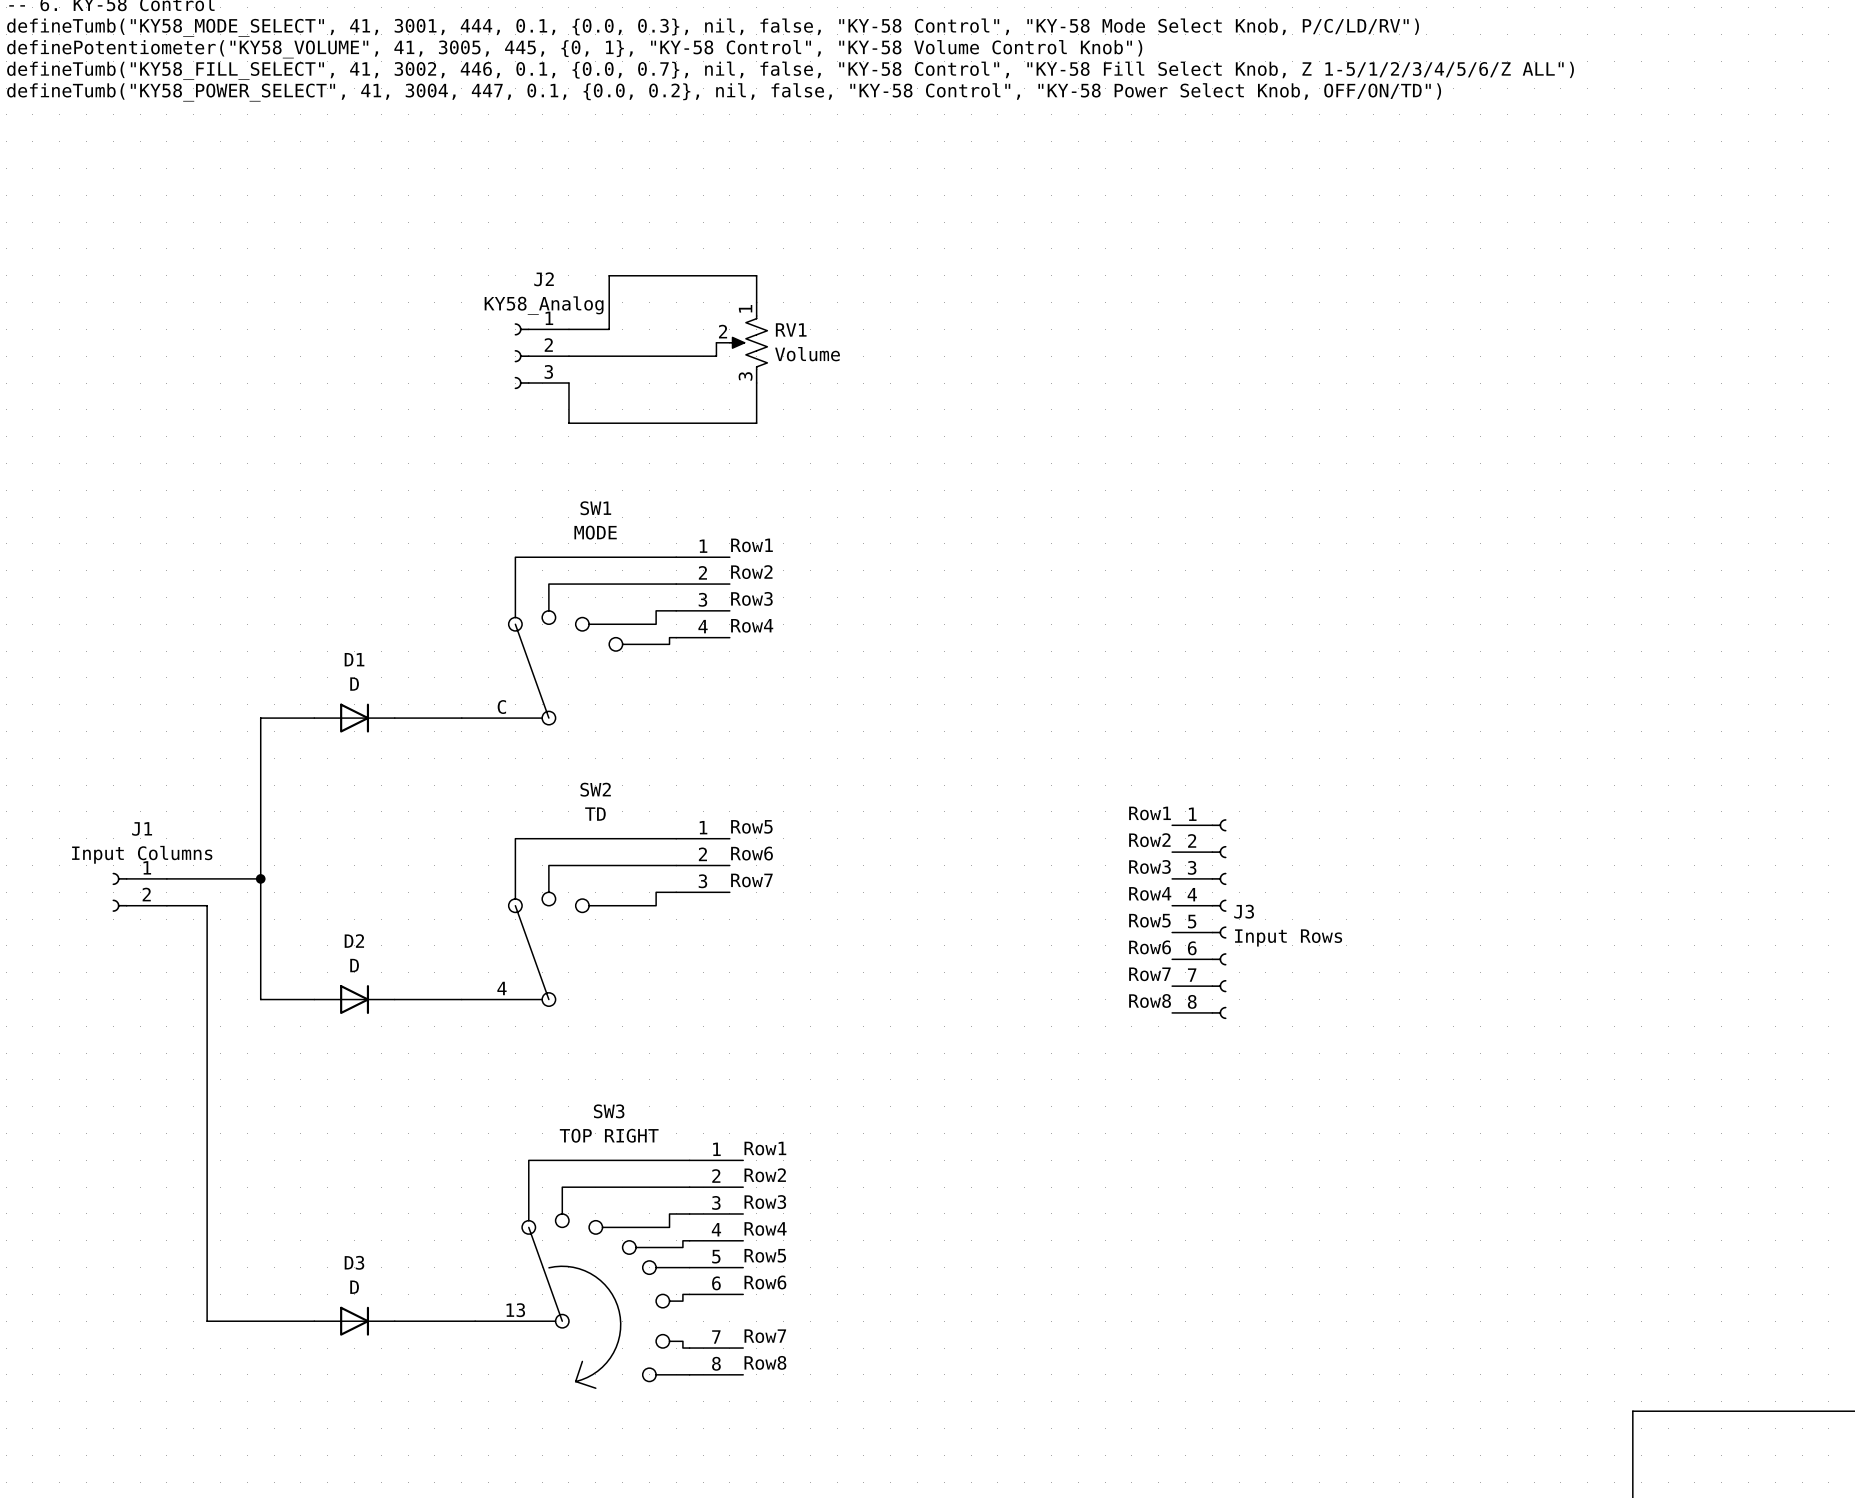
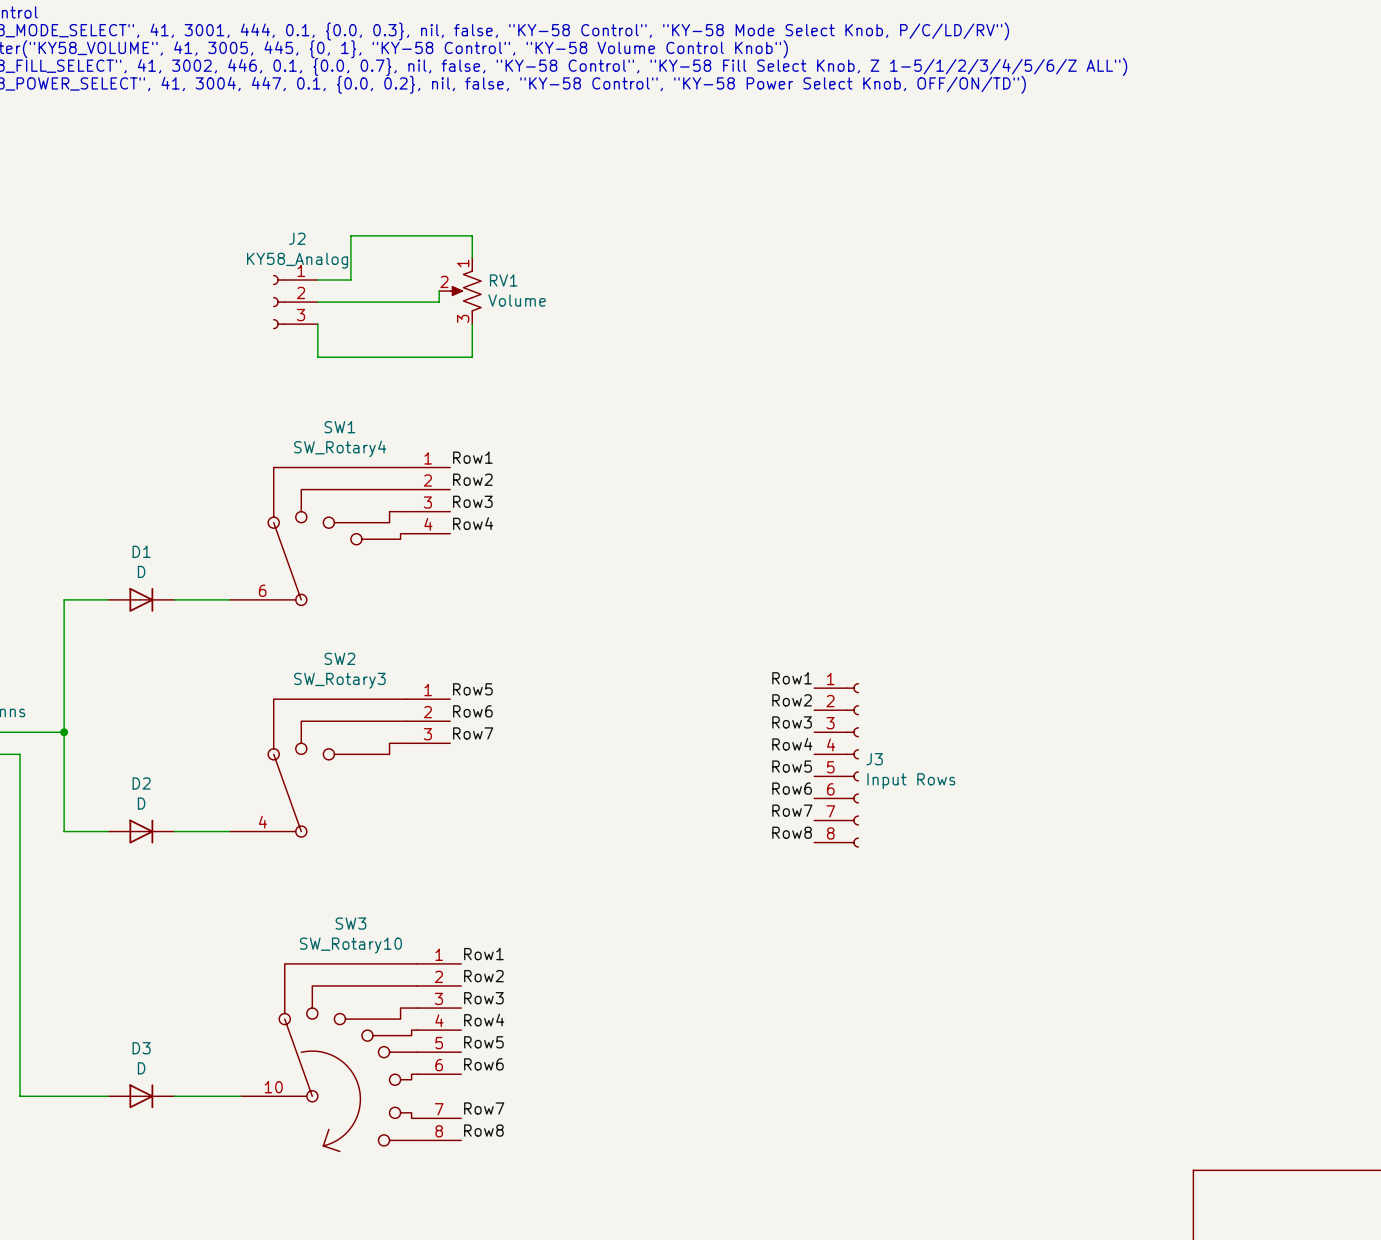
SW1 value: MODE (595, 532) -> SW_Rotary4 (340, 448)
SW1 pin number: C (501, 707) -> 6 (262, 590)
SW2 value: TD (595, 814) -> SW_Rotary3 (339, 680)
SW3 value: TOP RIGHT (609, 1135) -> SW_Rotary10 (350, 945)
SW3 pin number: 13 (515, 1310) -> 10 (273, 1087)

